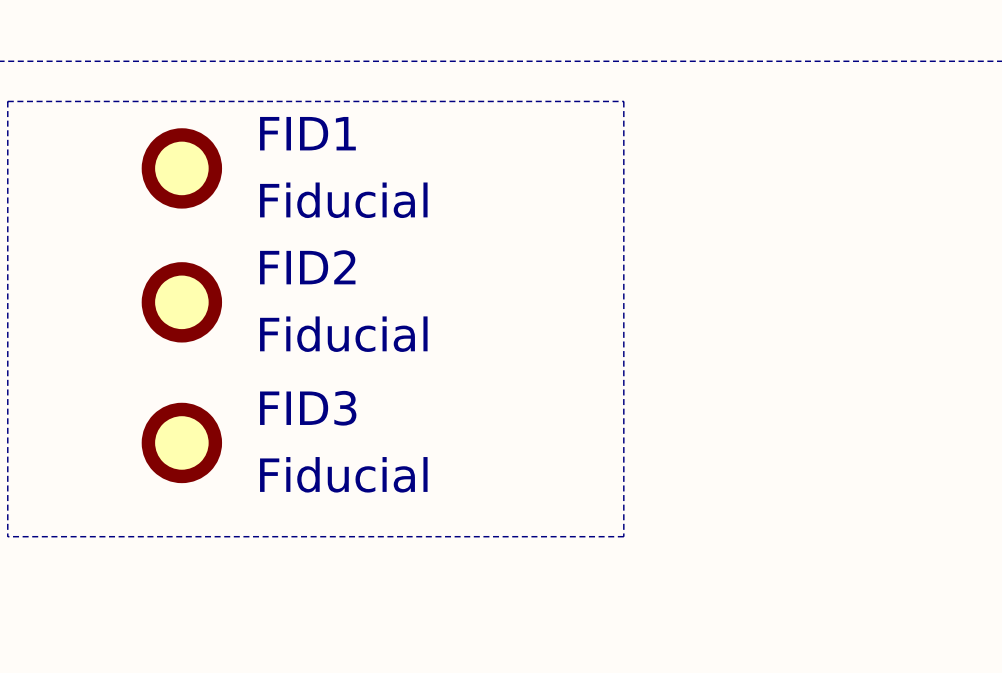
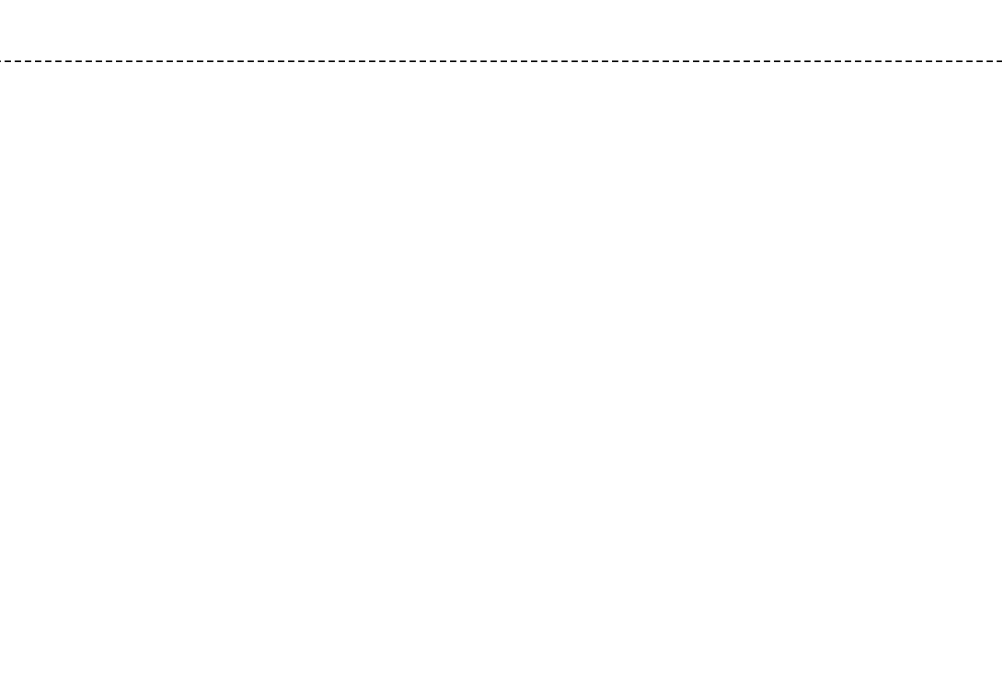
line: (7, 101) (623, 101) (623, 536) (7, 536) (7, 101) -> none
FID1: Fiducial (181, 168) -> none
FID2: Fiducial (181, 302) -> none
FID3: Fiducial (181, 442) -> none

